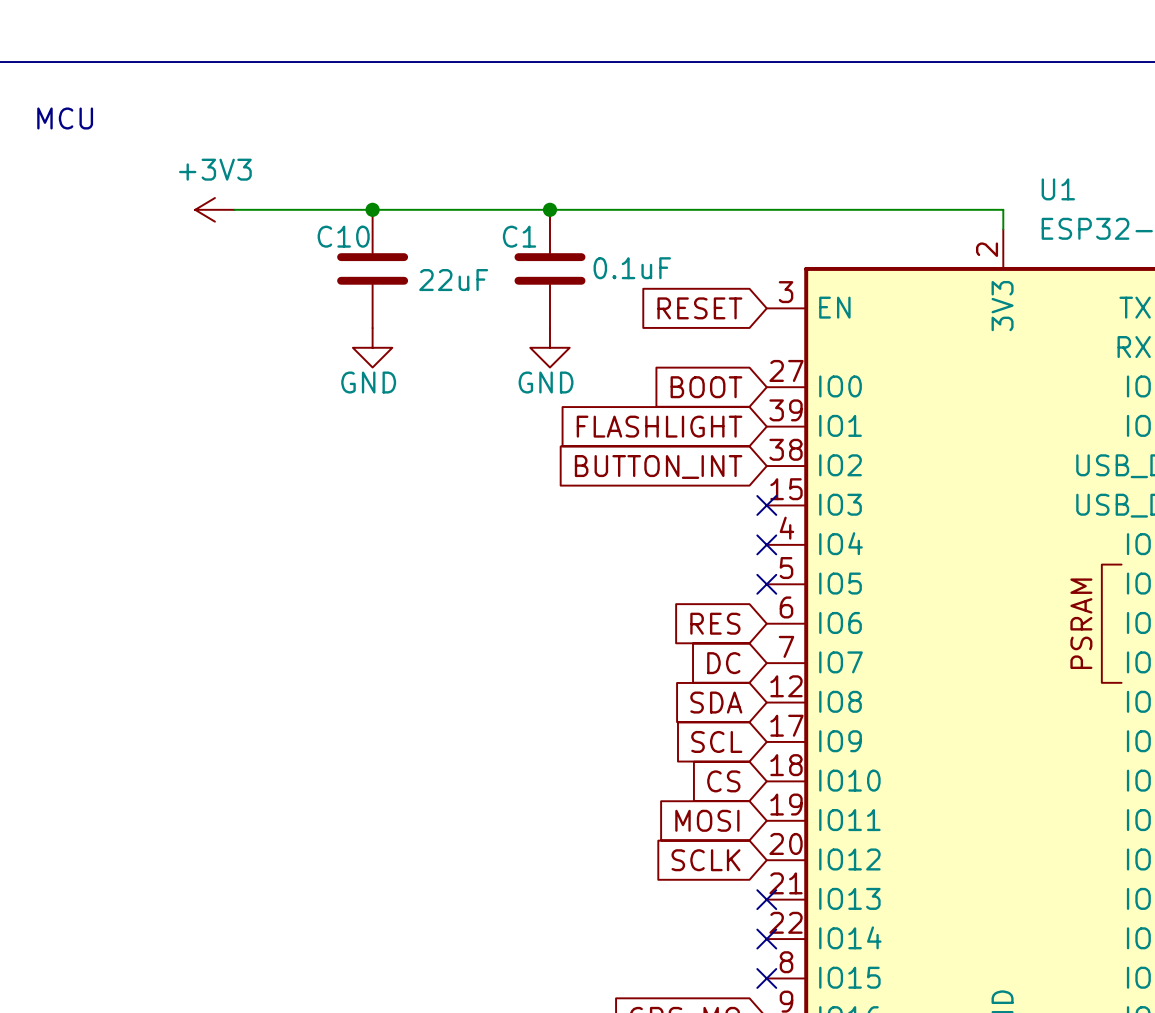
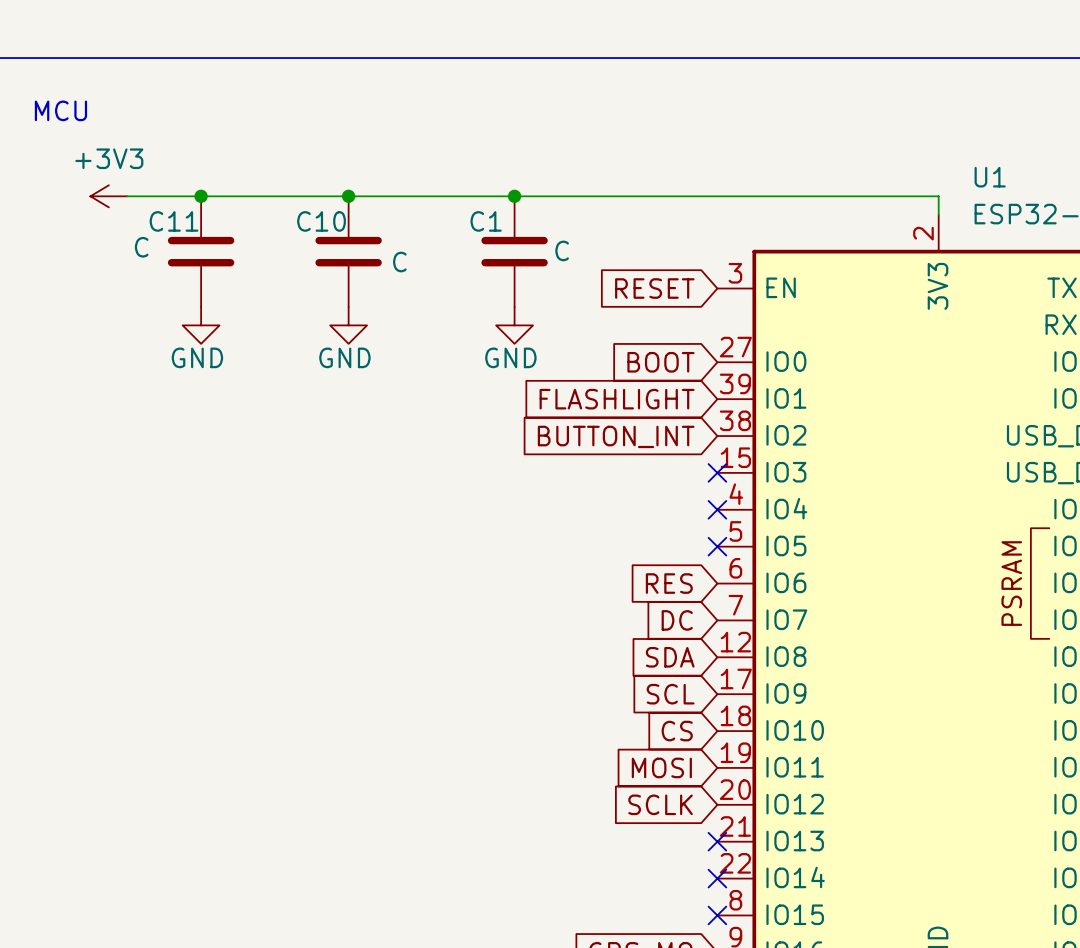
wire: none -> (127, 196) (219, 196)
power symbol position: +3V3 (214, 209) -> +3V3 (108, 196)
junction: none -> (201, 196)
C11: none -> C (201, 251)
C1 value: 0.1uF (632, 268) -> C (562, 250)
C10 value: 22uF (453, 280) -> C (399, 262)
power symbol: none -> GND (201, 325)

